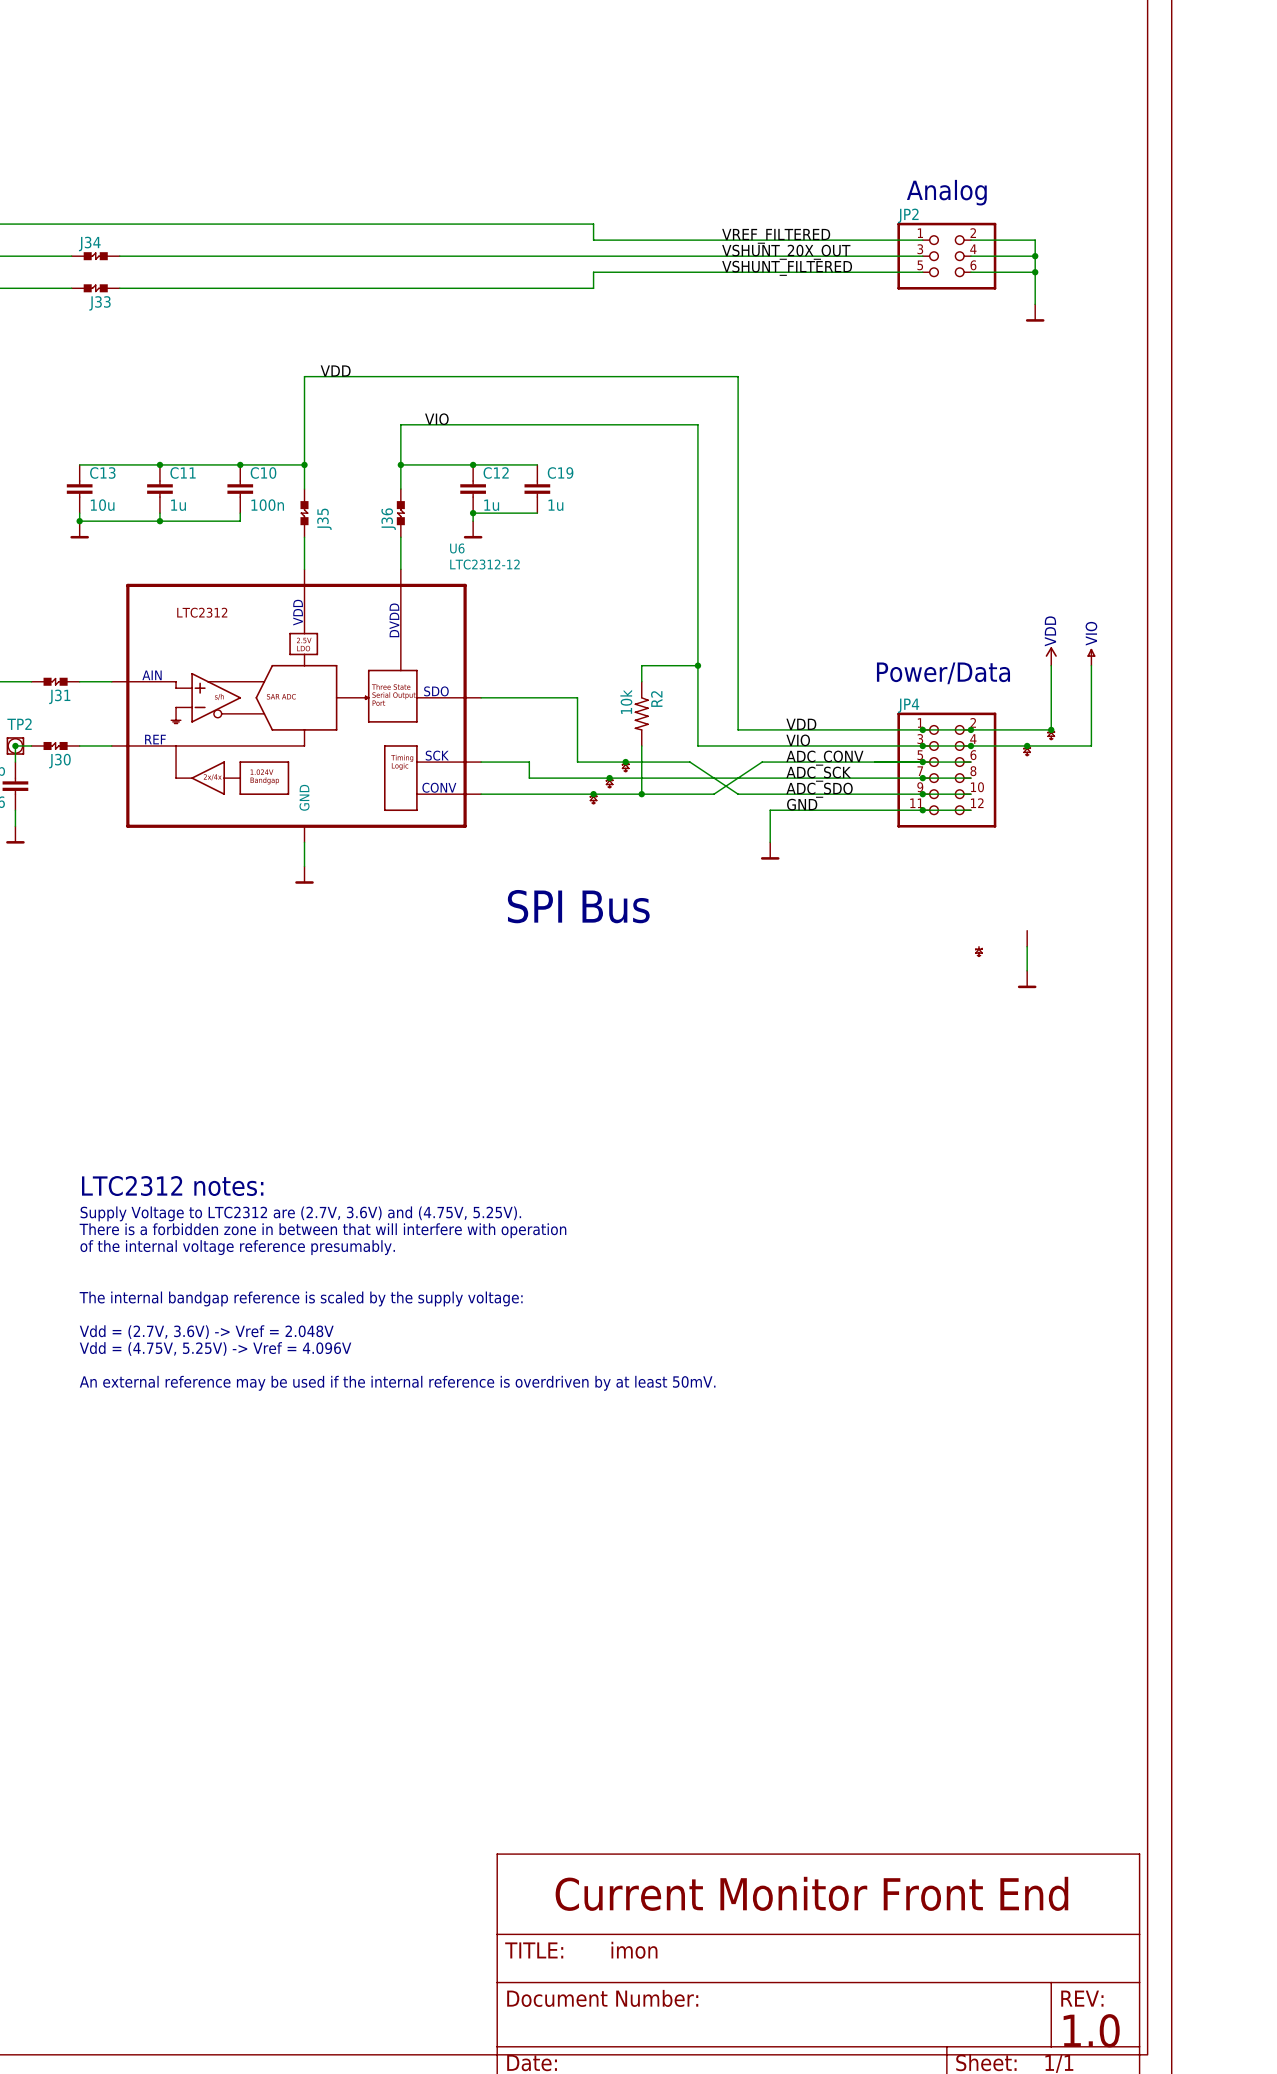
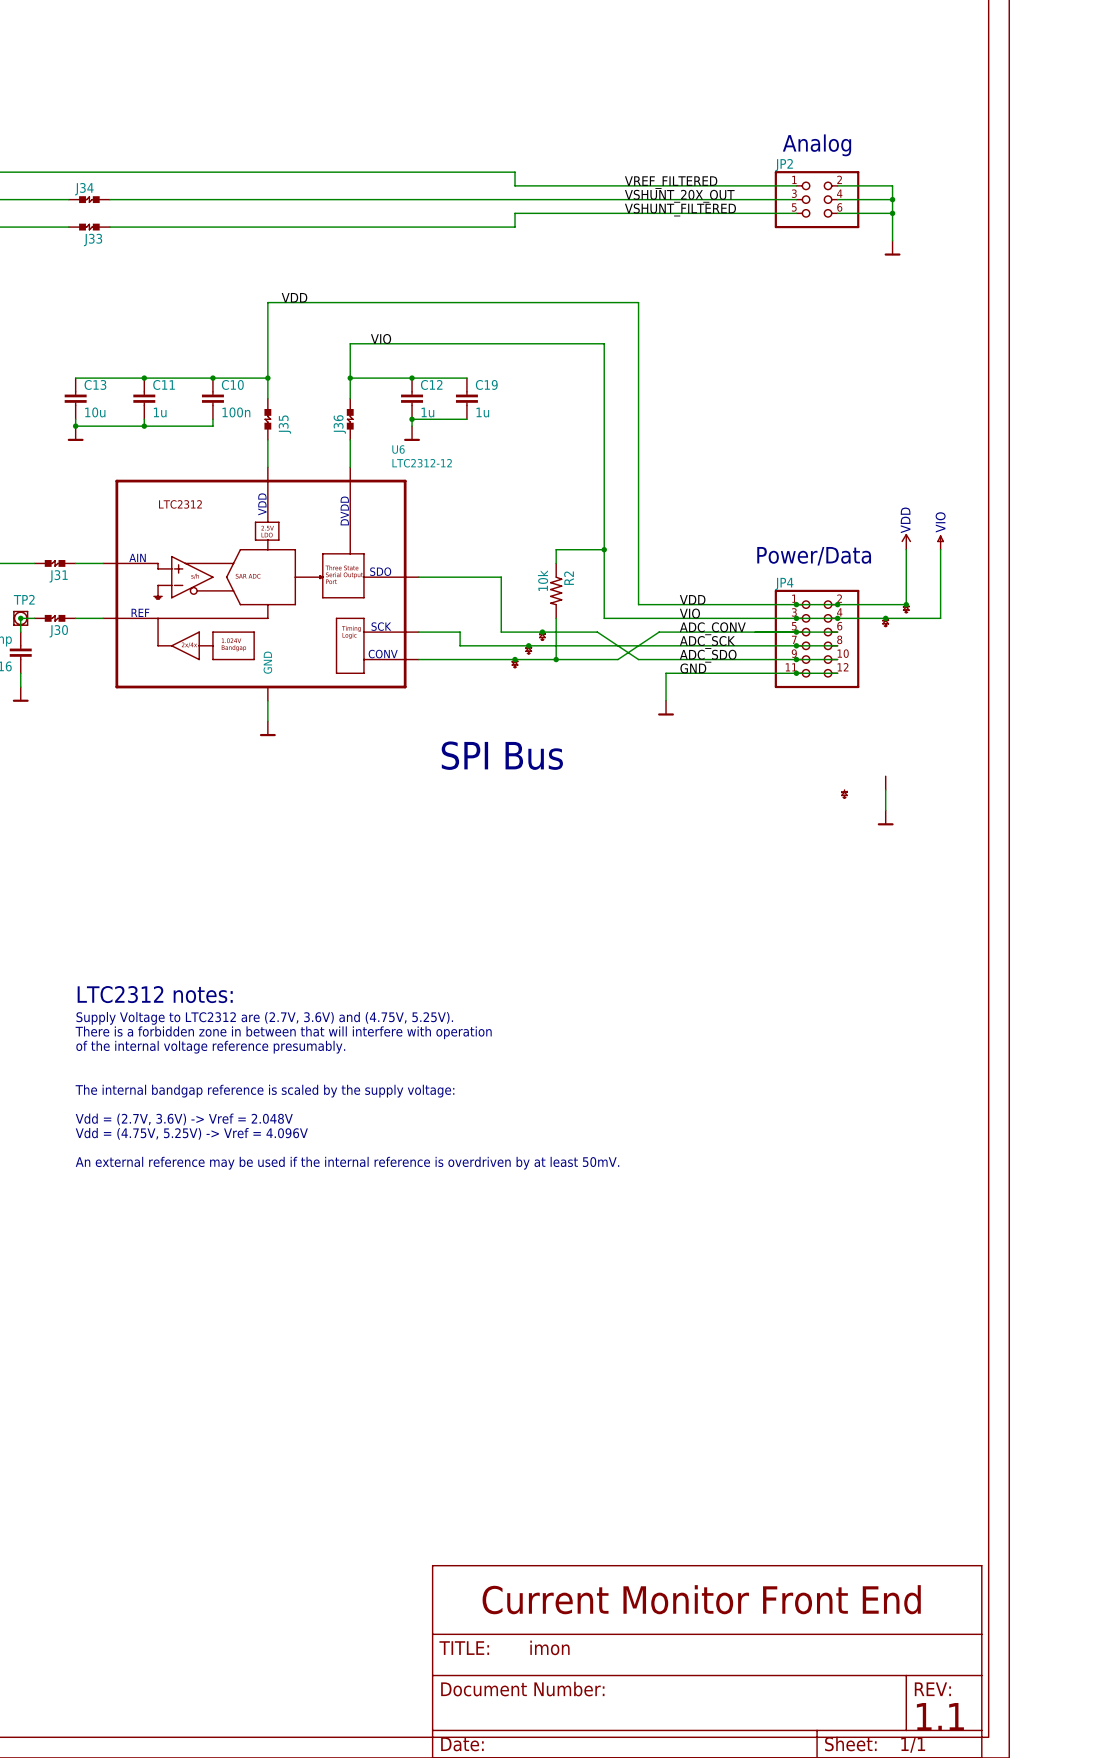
text: 1.0 (1091, 2030) -> 1.1 (940, 1716)

